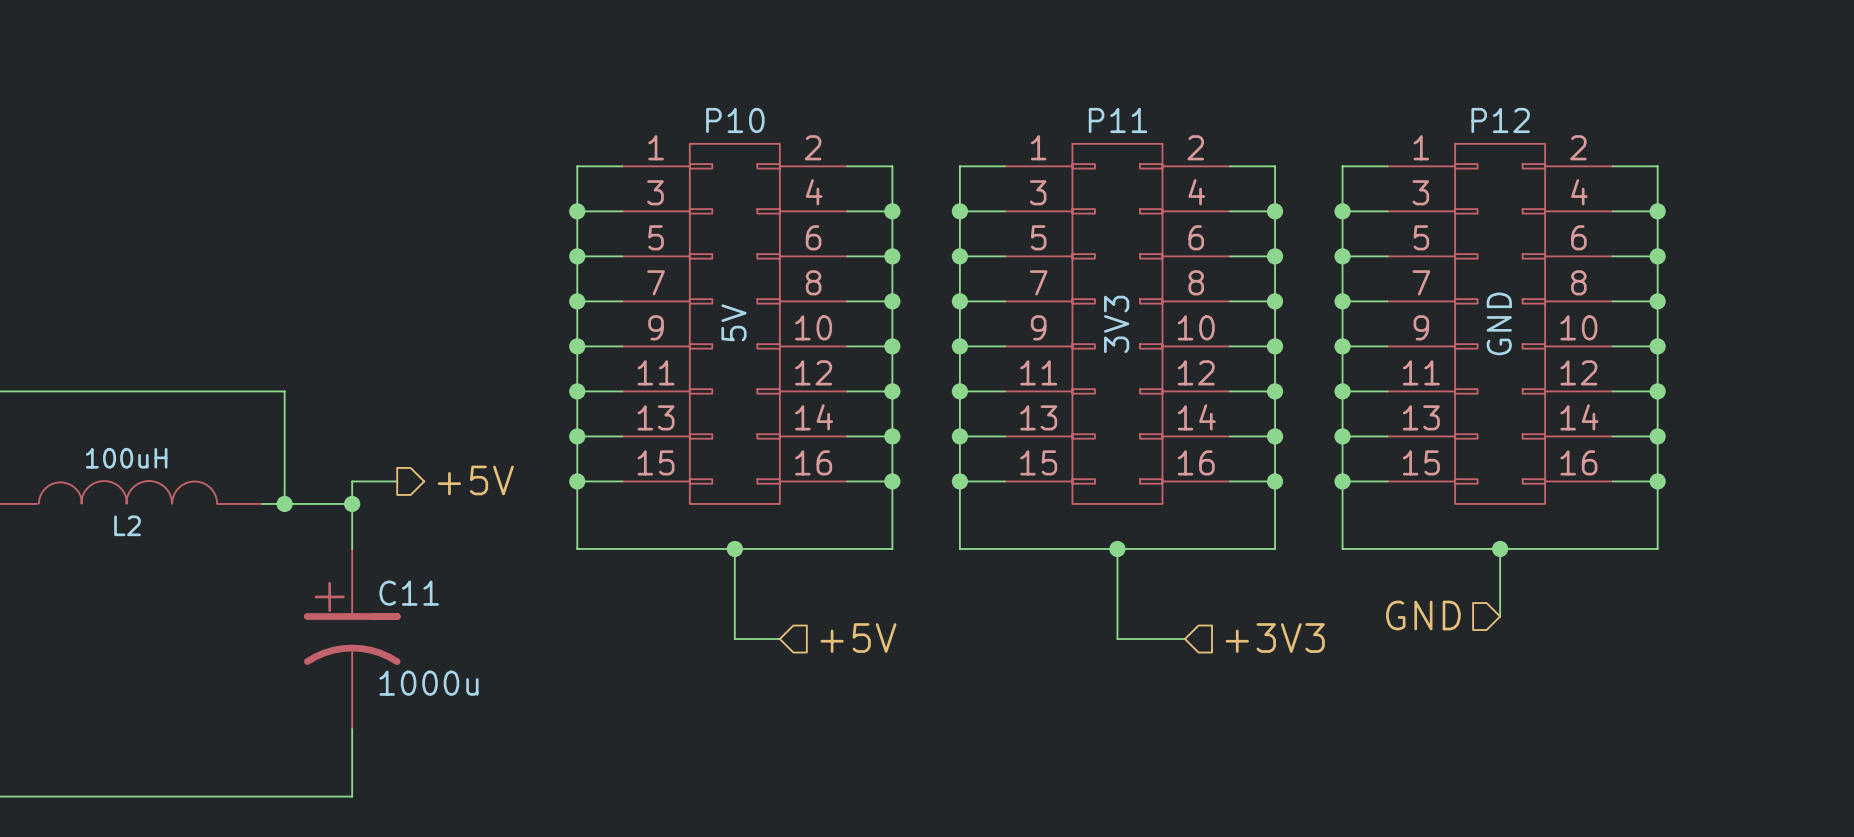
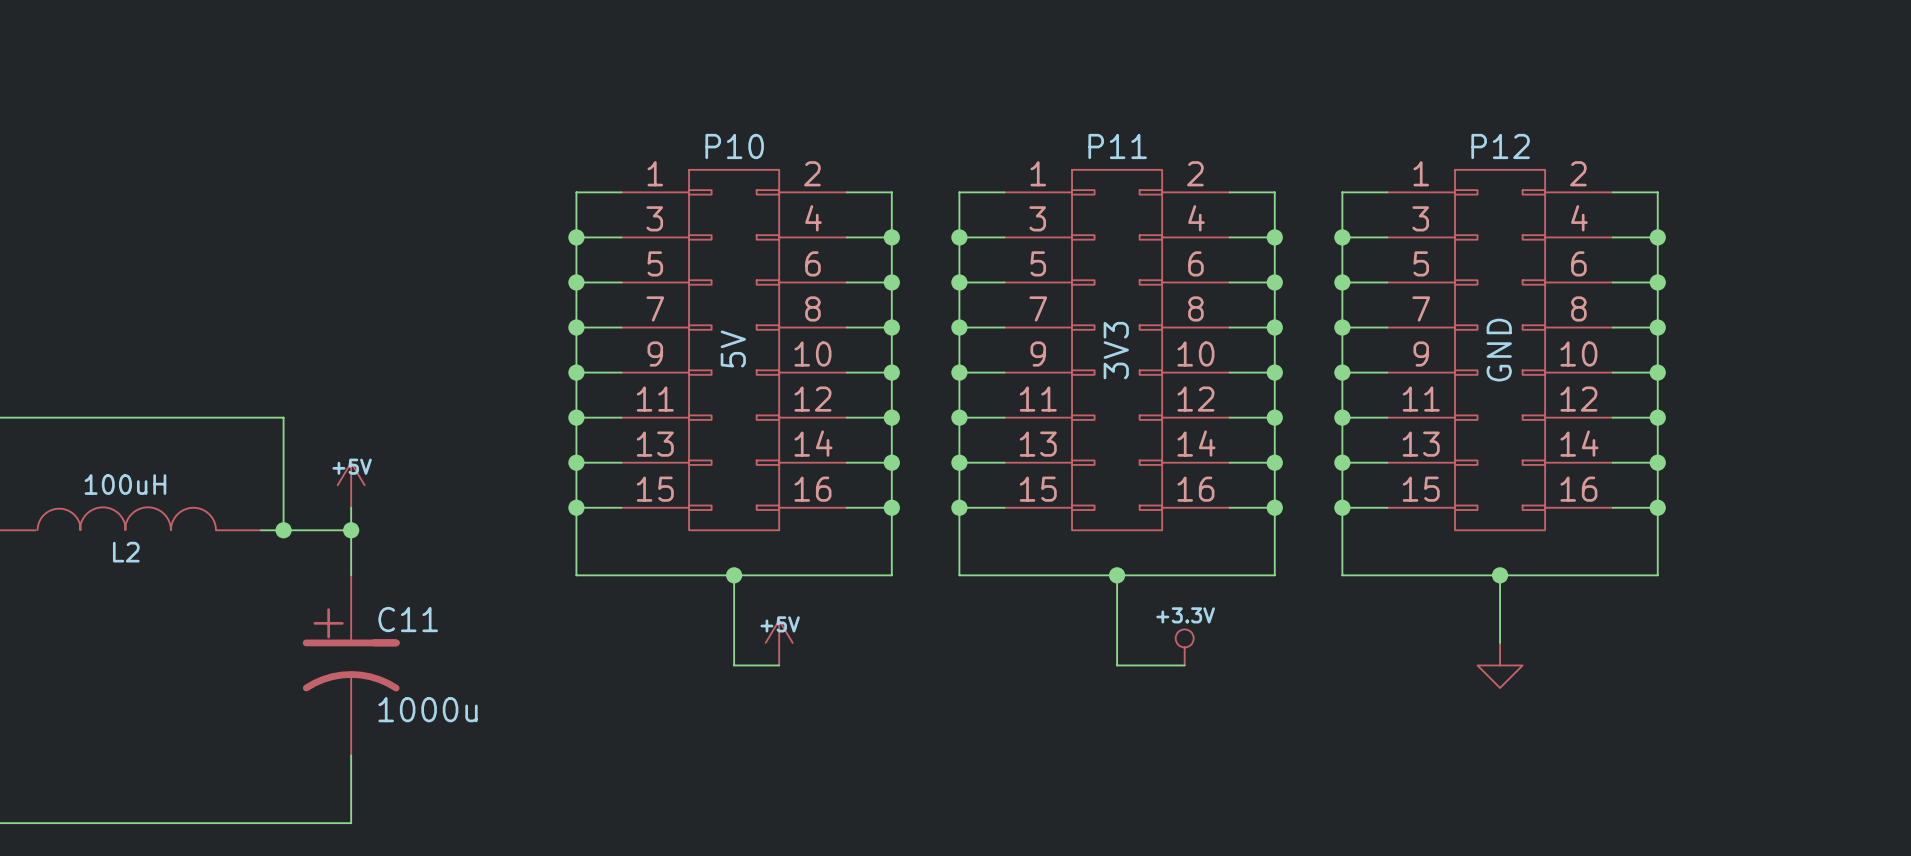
power symbol: none -> +5V (351, 485)
hierarchical label: +5V (475, 480) -> none
wire: (352, 481) (397, 481) -> none
hierarchical label: GND (1423, 615) -> none
power symbol: none -> +5V (779, 642)
power symbol: none -> +3.3V (1184, 647)
hierarchical label: +5V (858, 638) -> none
hierarchical label: +3V3 (1275, 638) -> none
power symbol: none -> (1500, 665)

